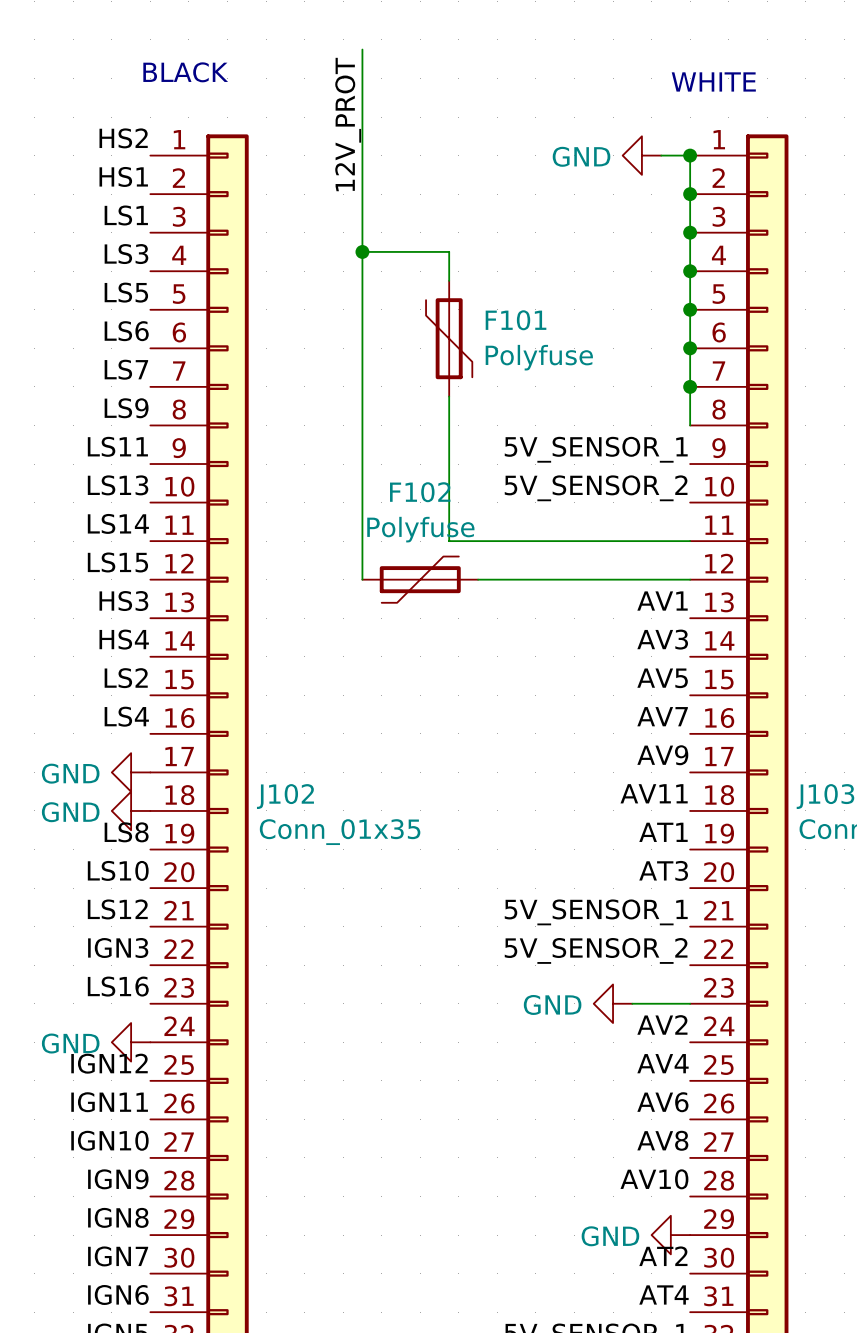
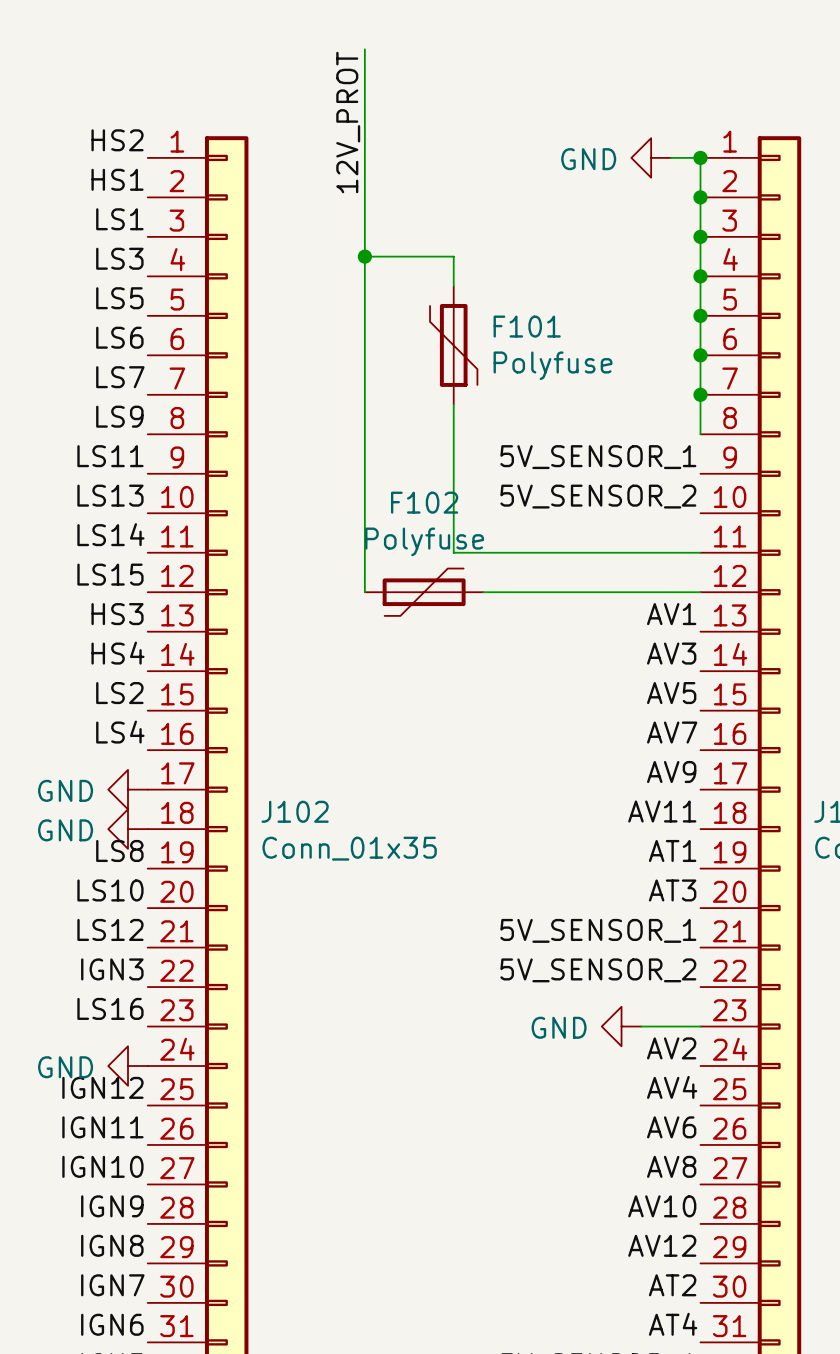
text: BLACK (185, 72) -> none
text: WHITE (713, 81) -> none
label: none -> AV12 (662, 1245)
power symbol: GND (670, 1235) -> none

